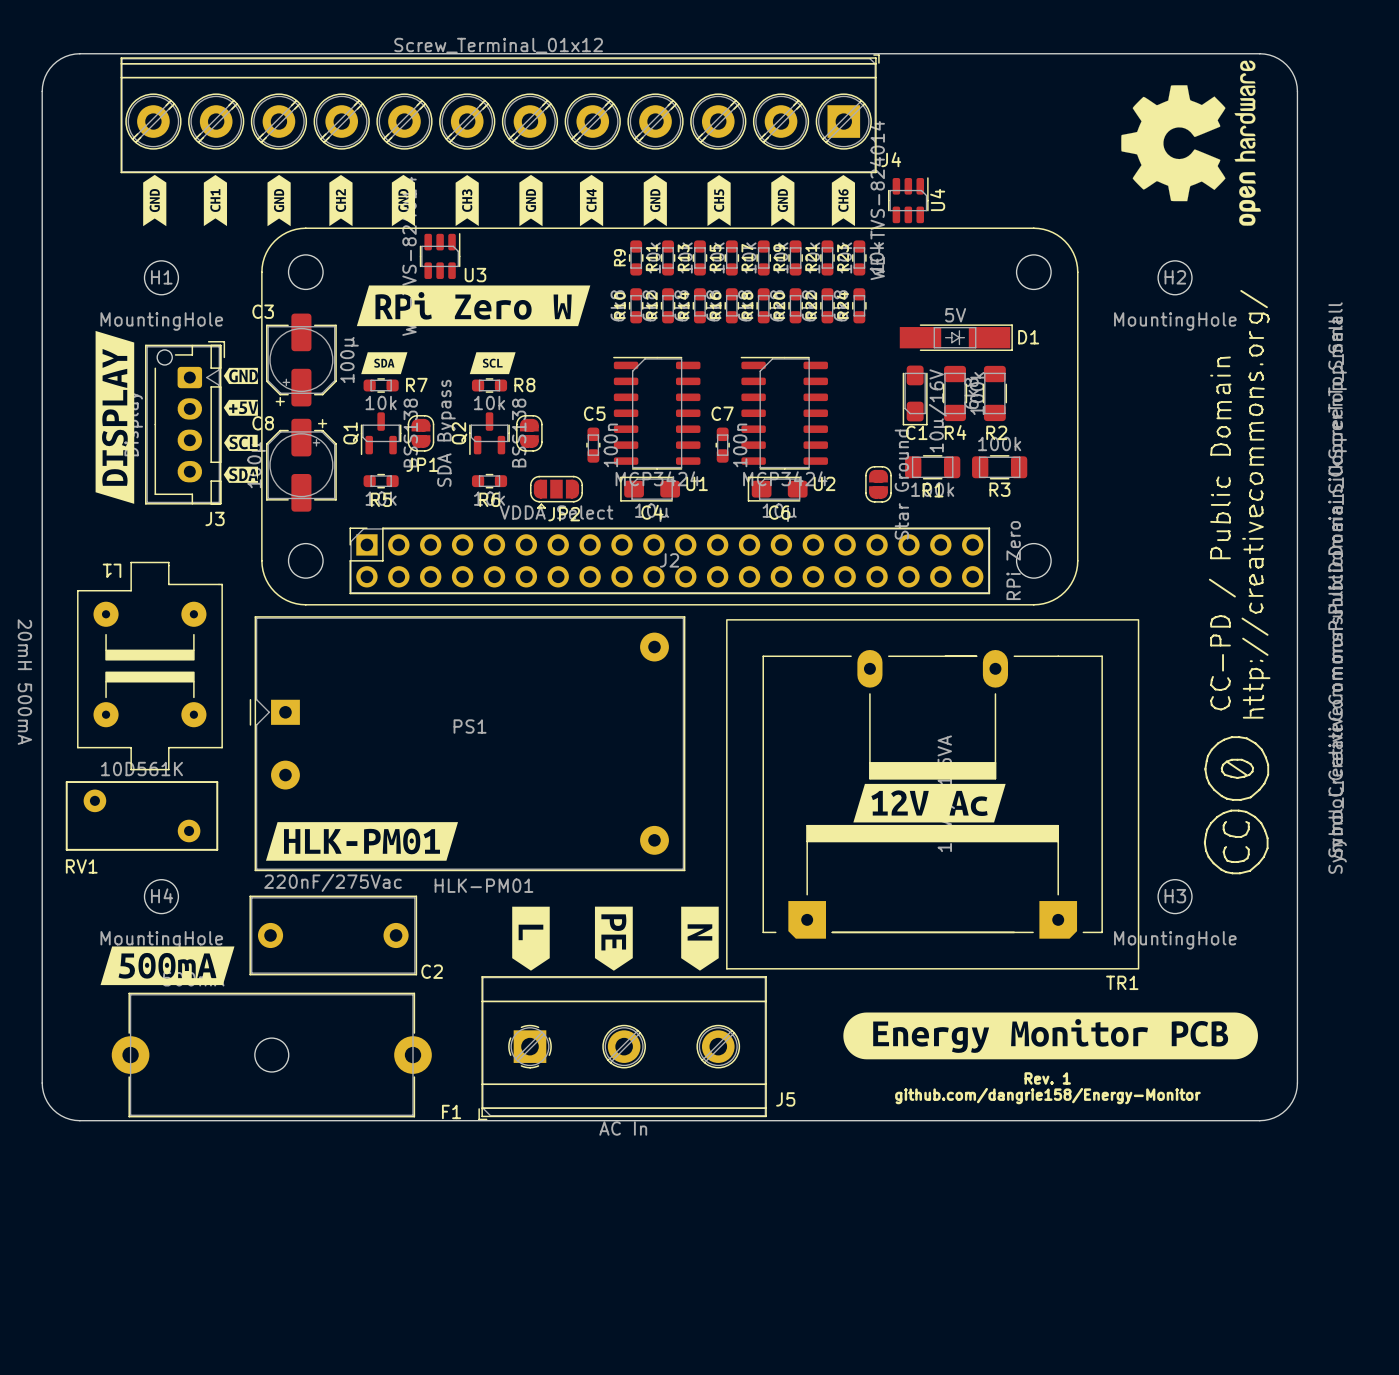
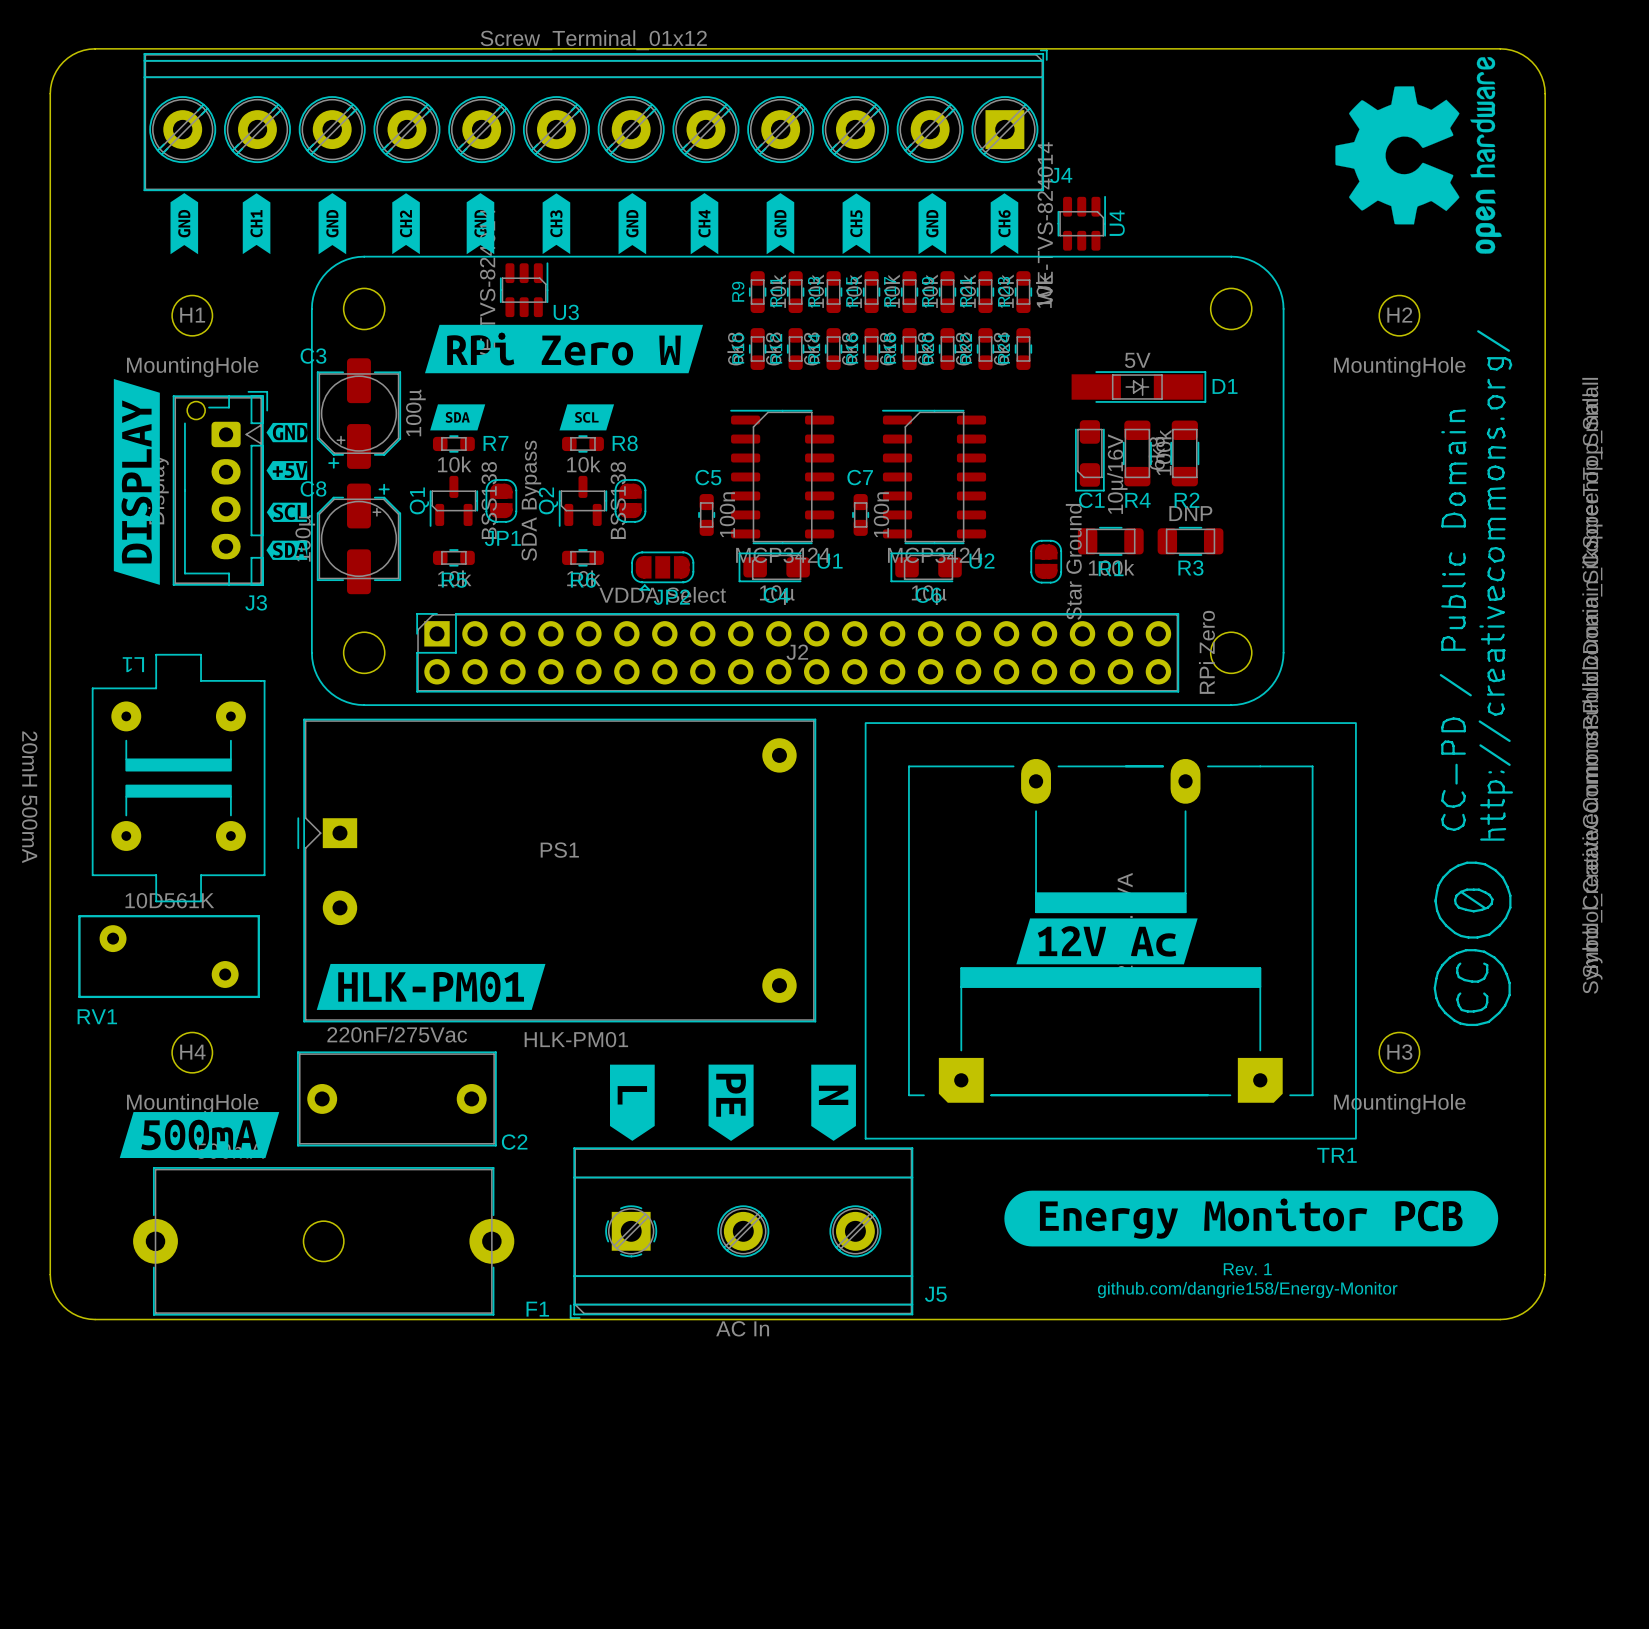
R3 value: 100k (999, 443) -> DNP (1190, 513)

